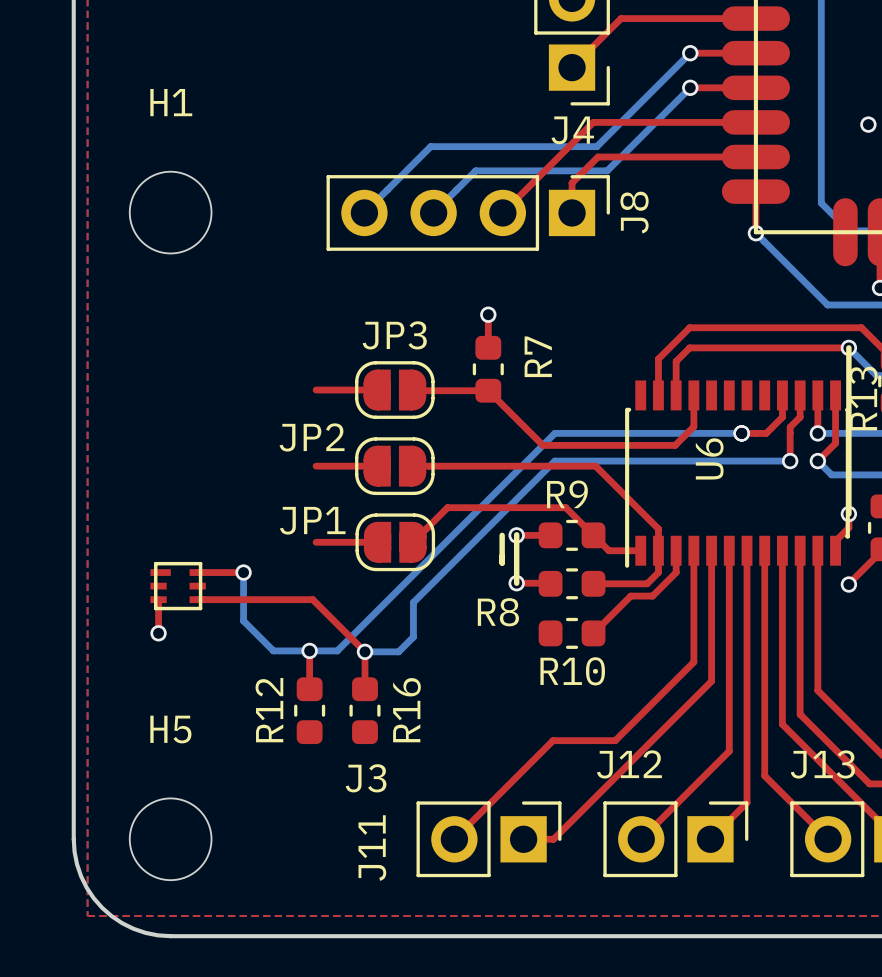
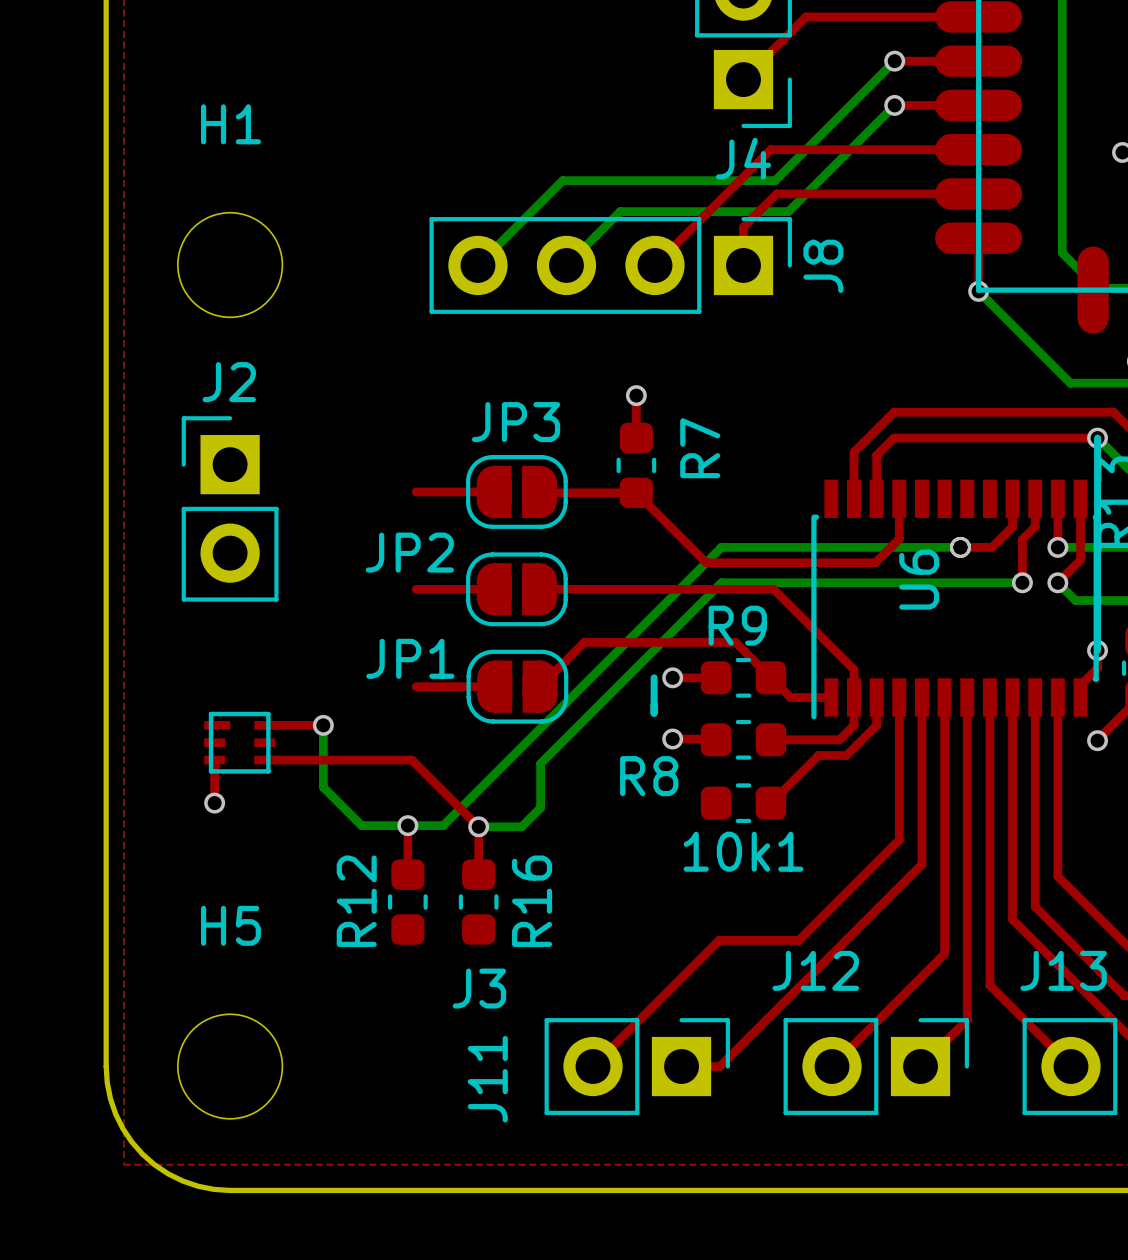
J2: none -> (230, 508)
line: (516, 534) (516, 583) -> none
R10 name: R10 (572, 671) -> 10k1 (743, 851)

